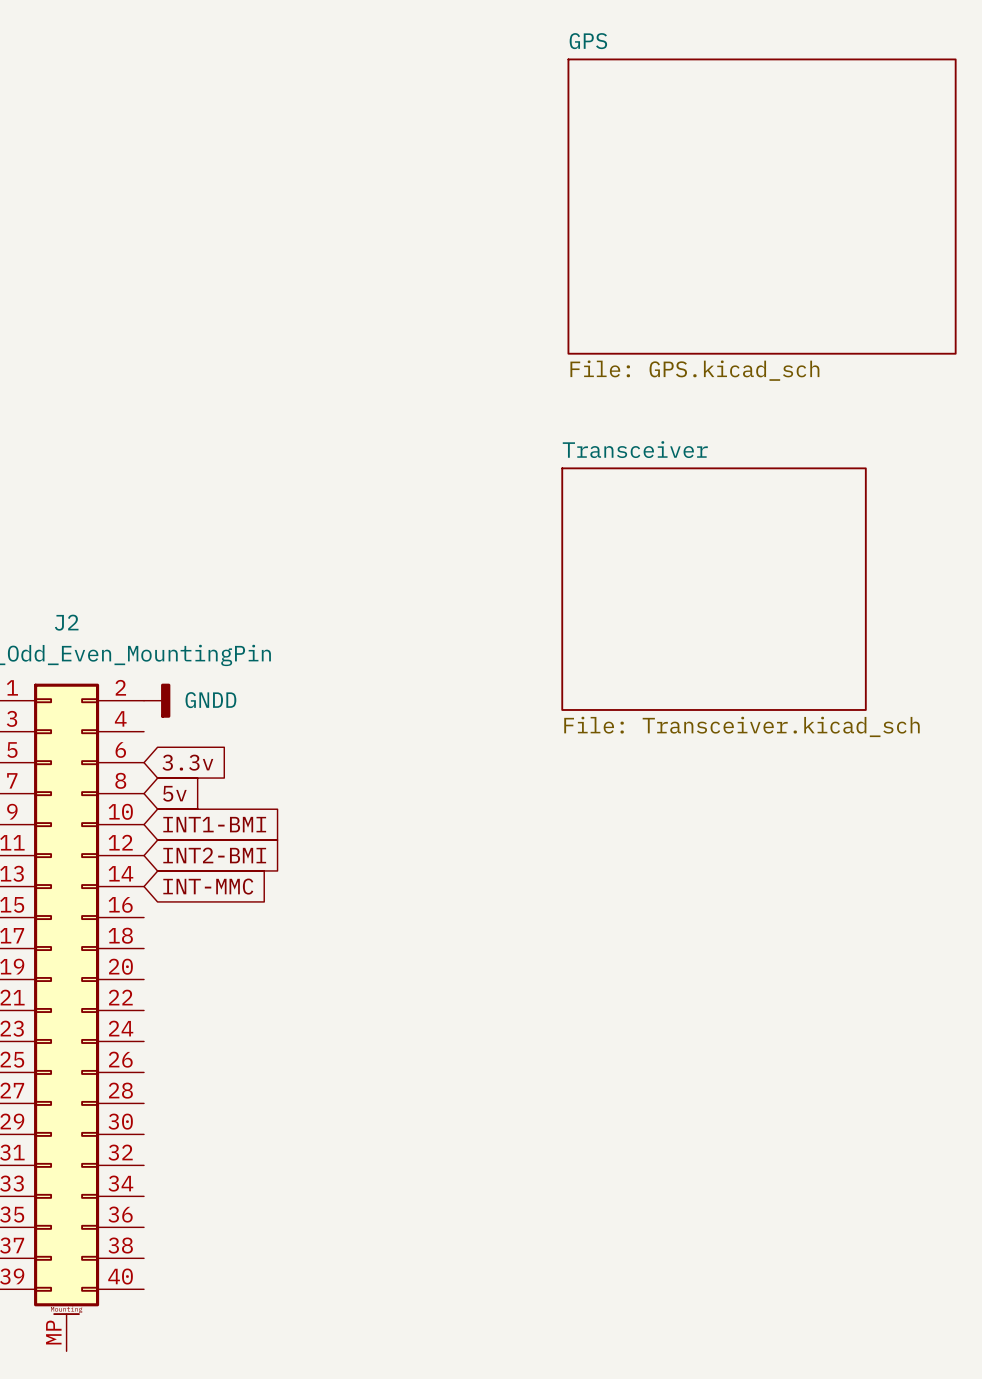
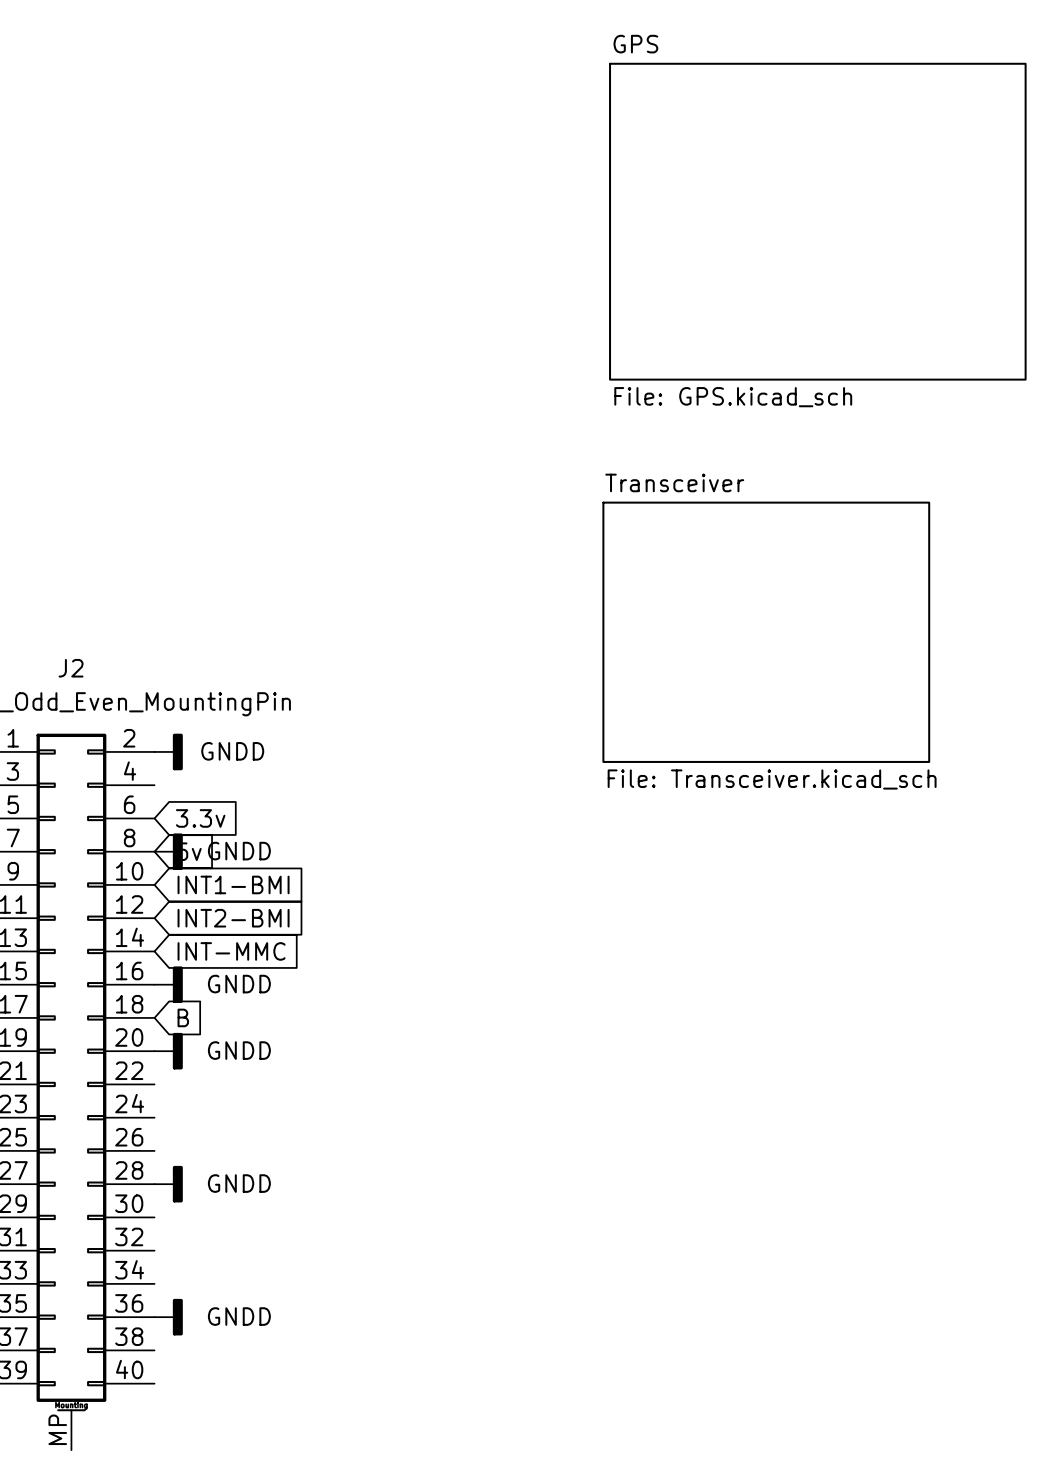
power symbol: none -> GNDD (168, 851)
power symbol: none -> GNDD (168, 984)
global label: none -> B (183, 1017)
power symbol: none -> GNDD (168, 1051)
power symbol: none -> GNDD (168, 1184)
power symbol: none -> GNDD (168, 1317)

